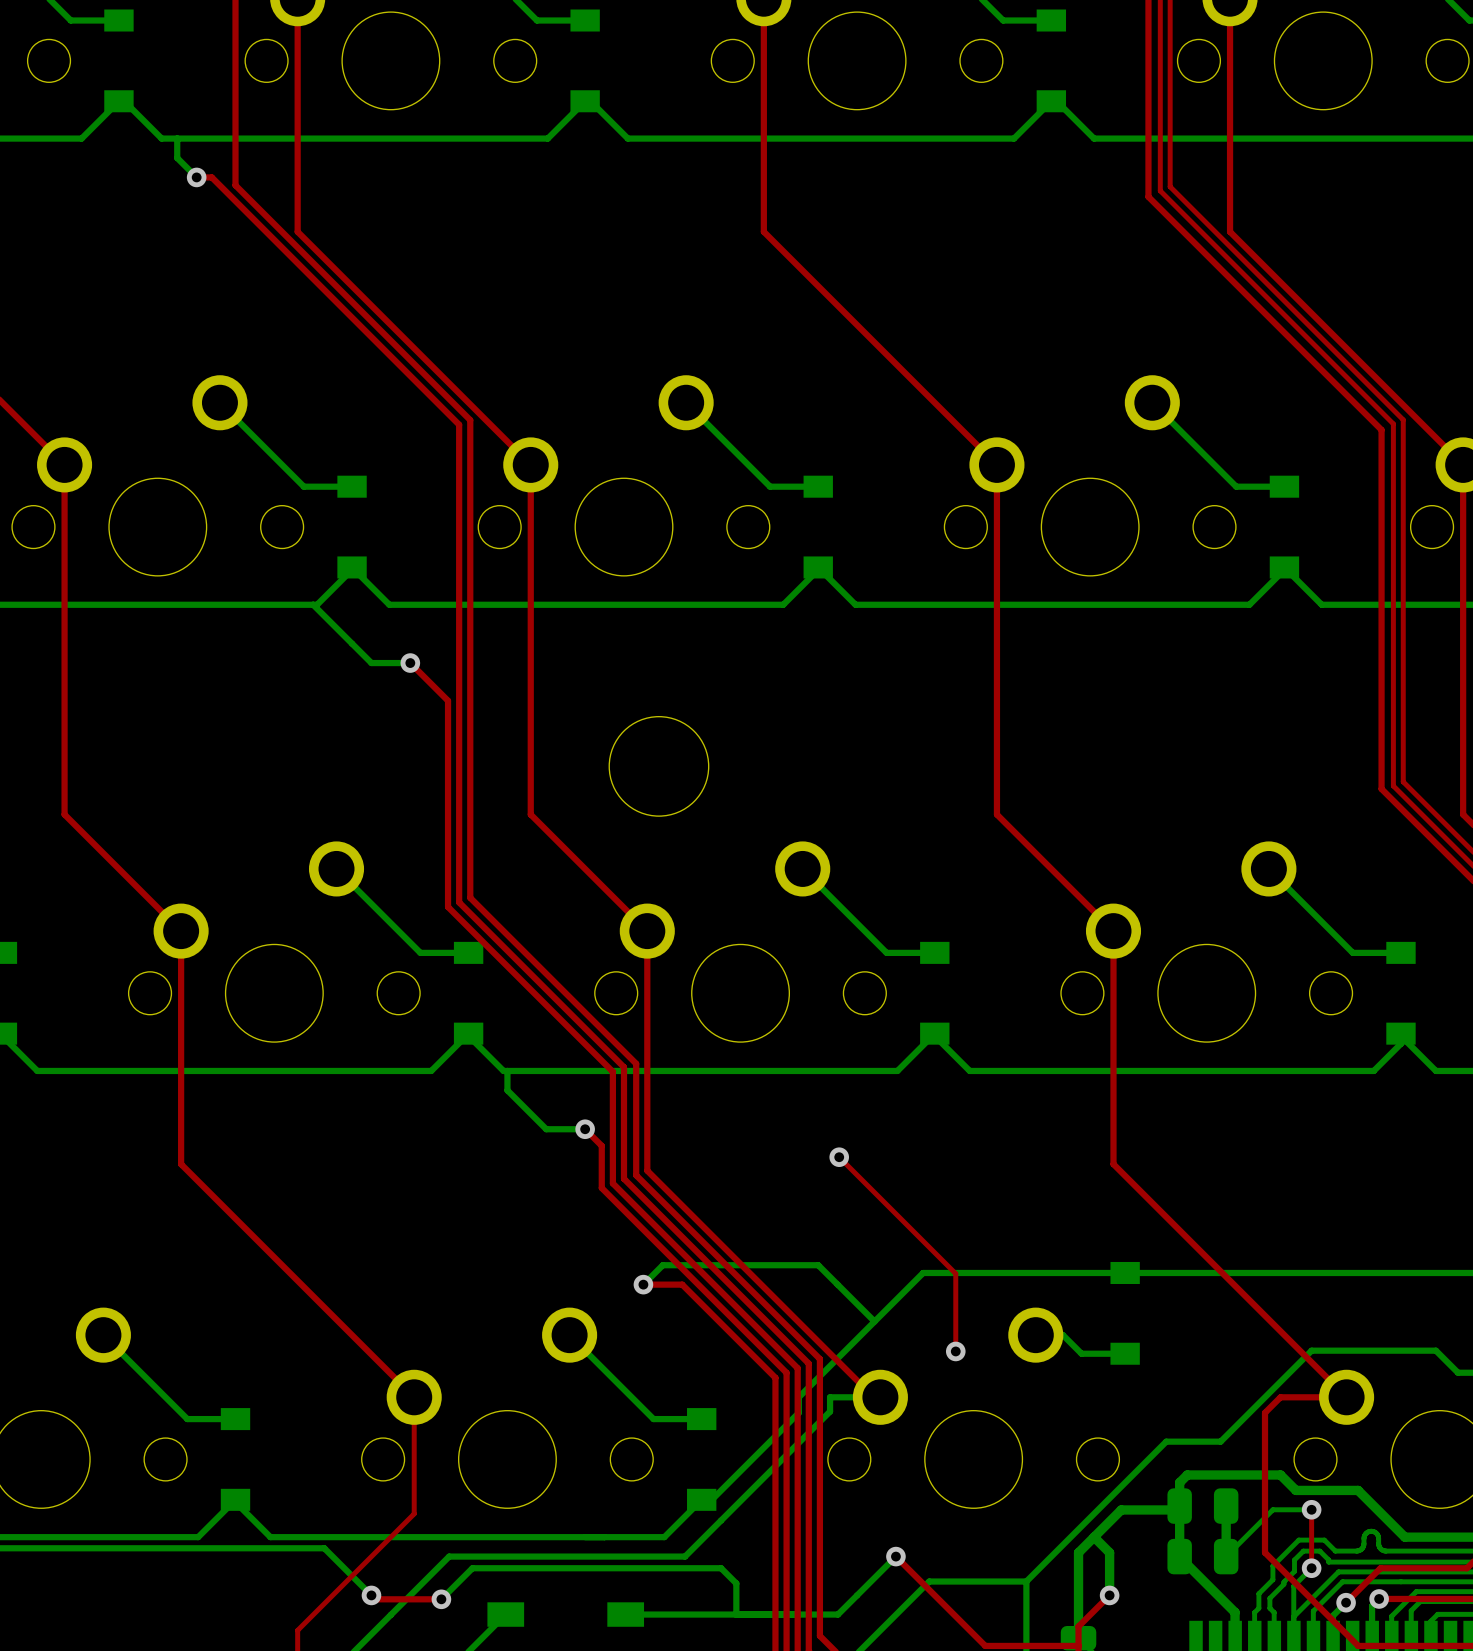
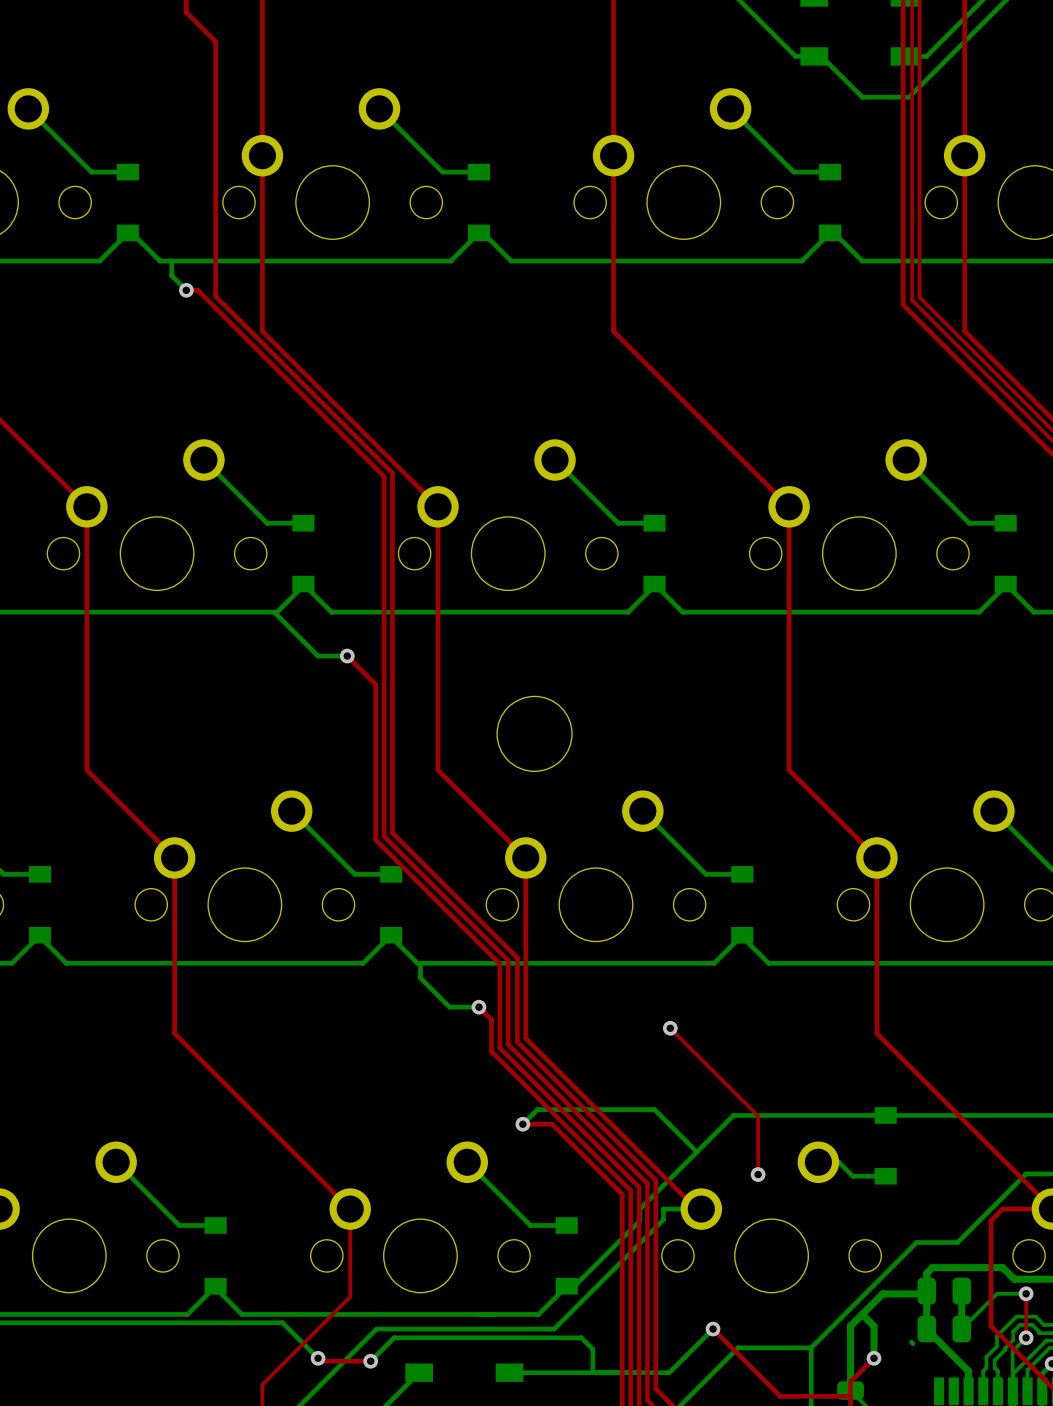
bottom track: none -> (911, 1342) (912, 1343)

